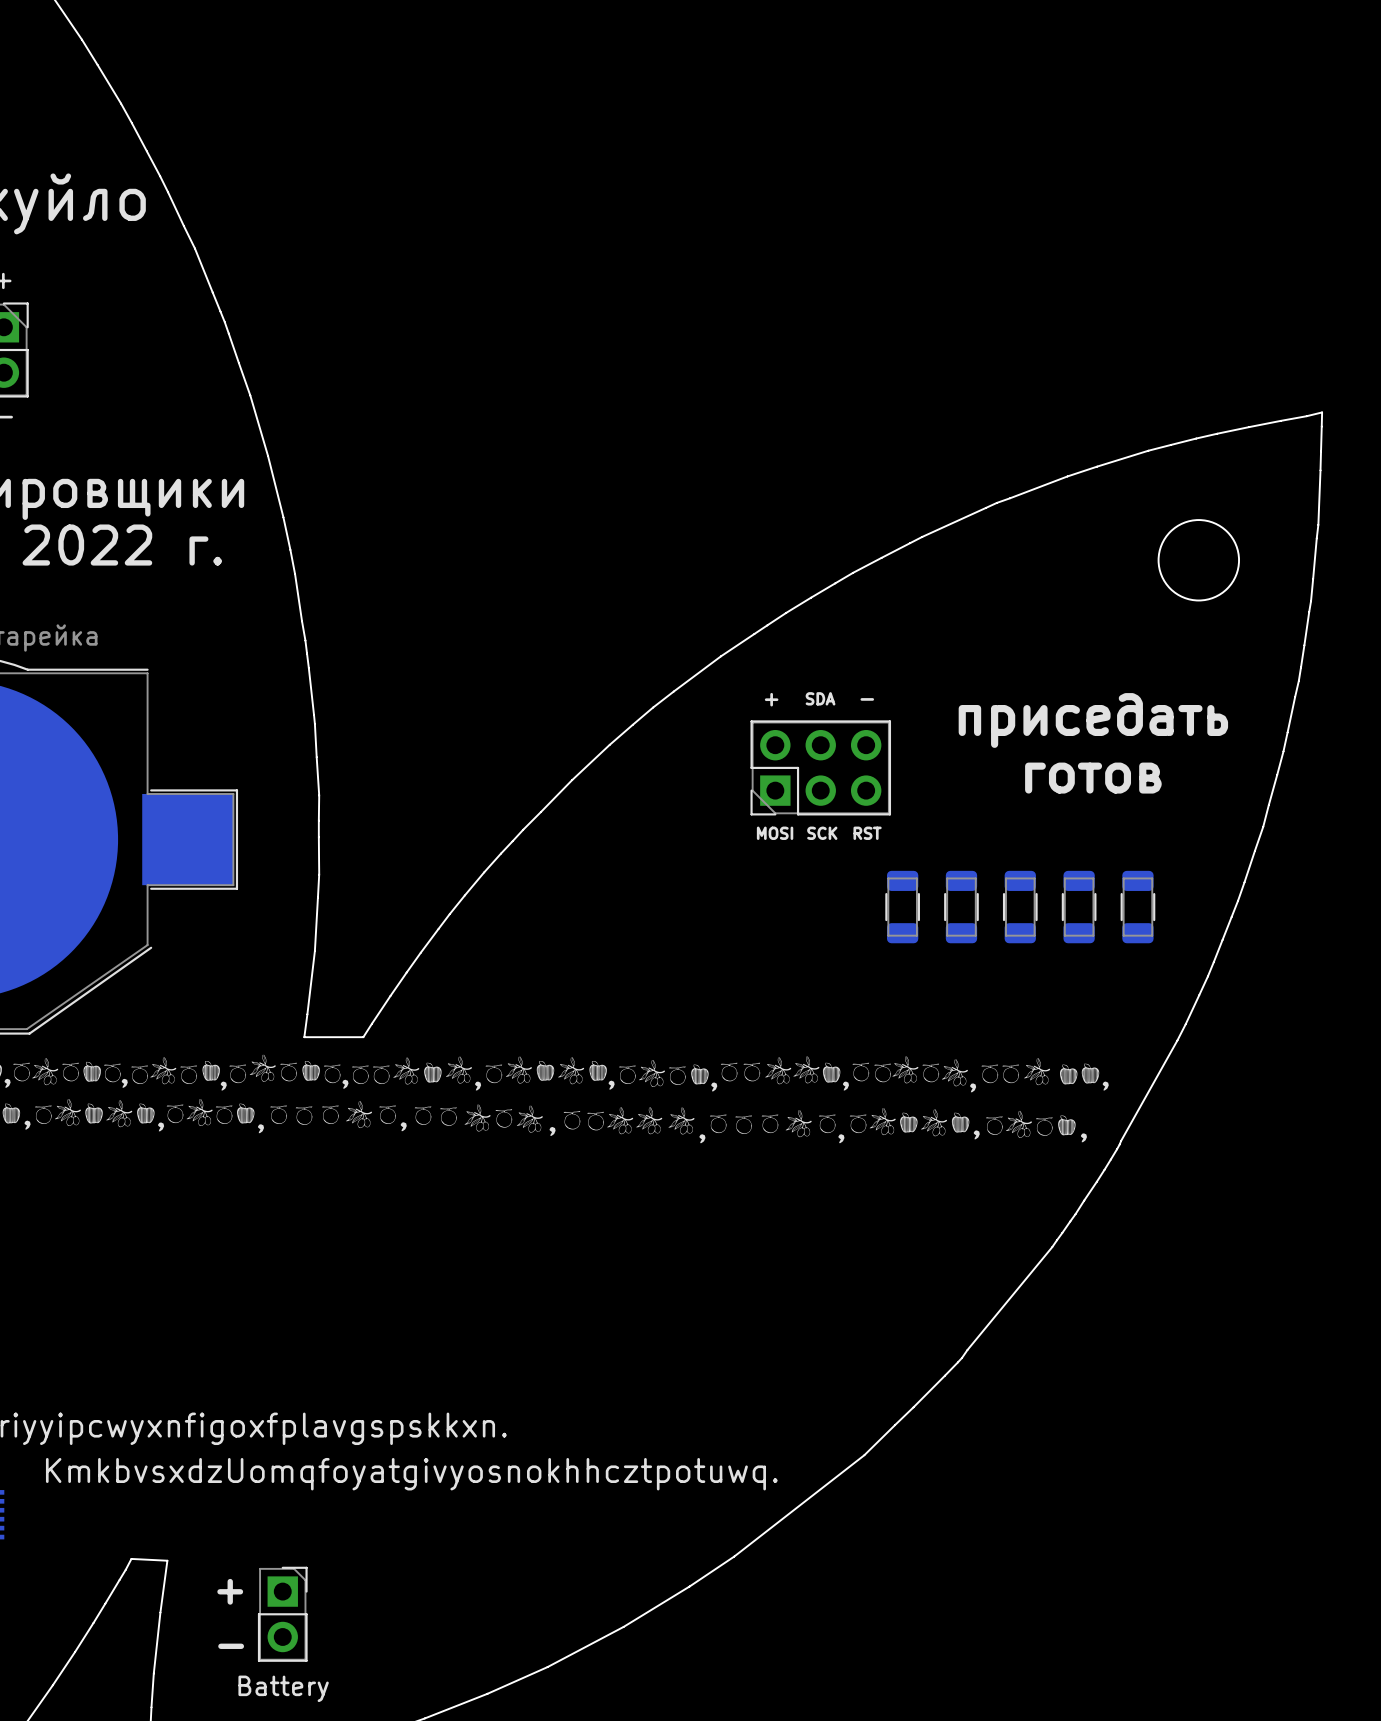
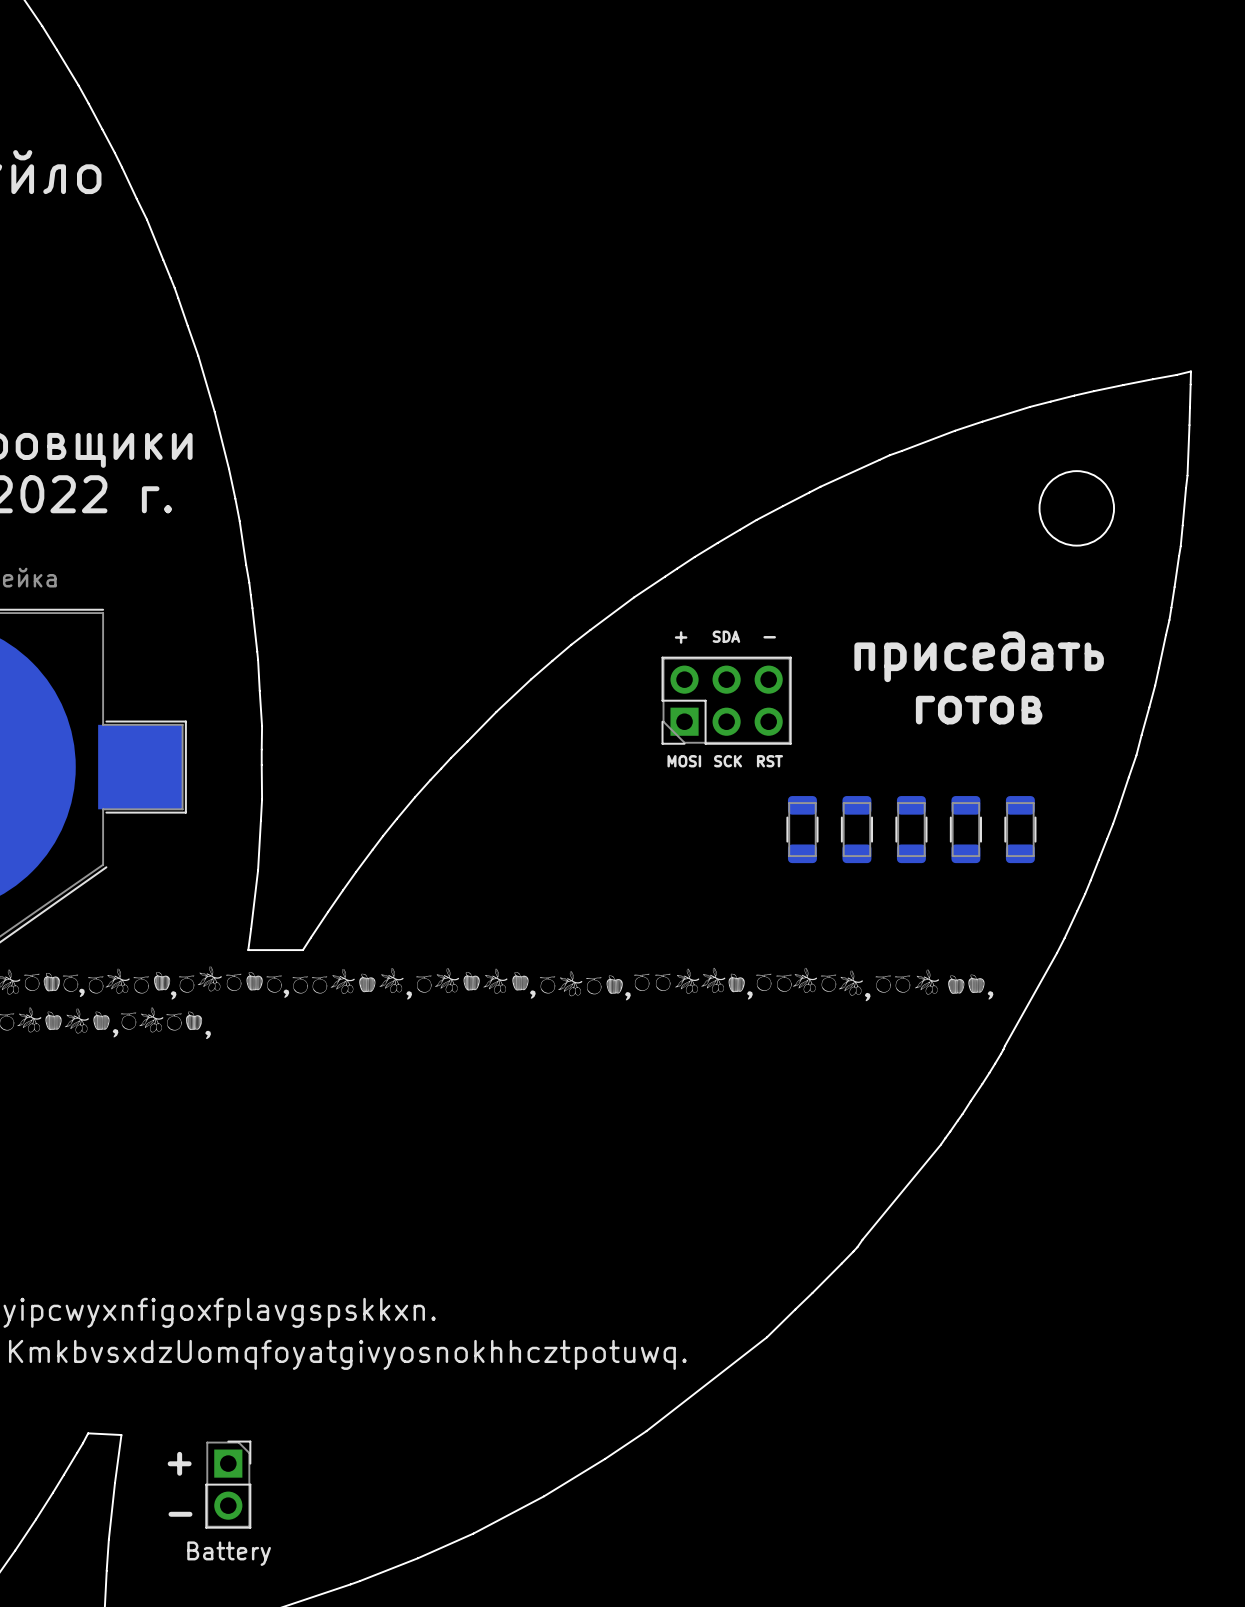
drawing: [270, 1101, 1087, 1144] -> none

